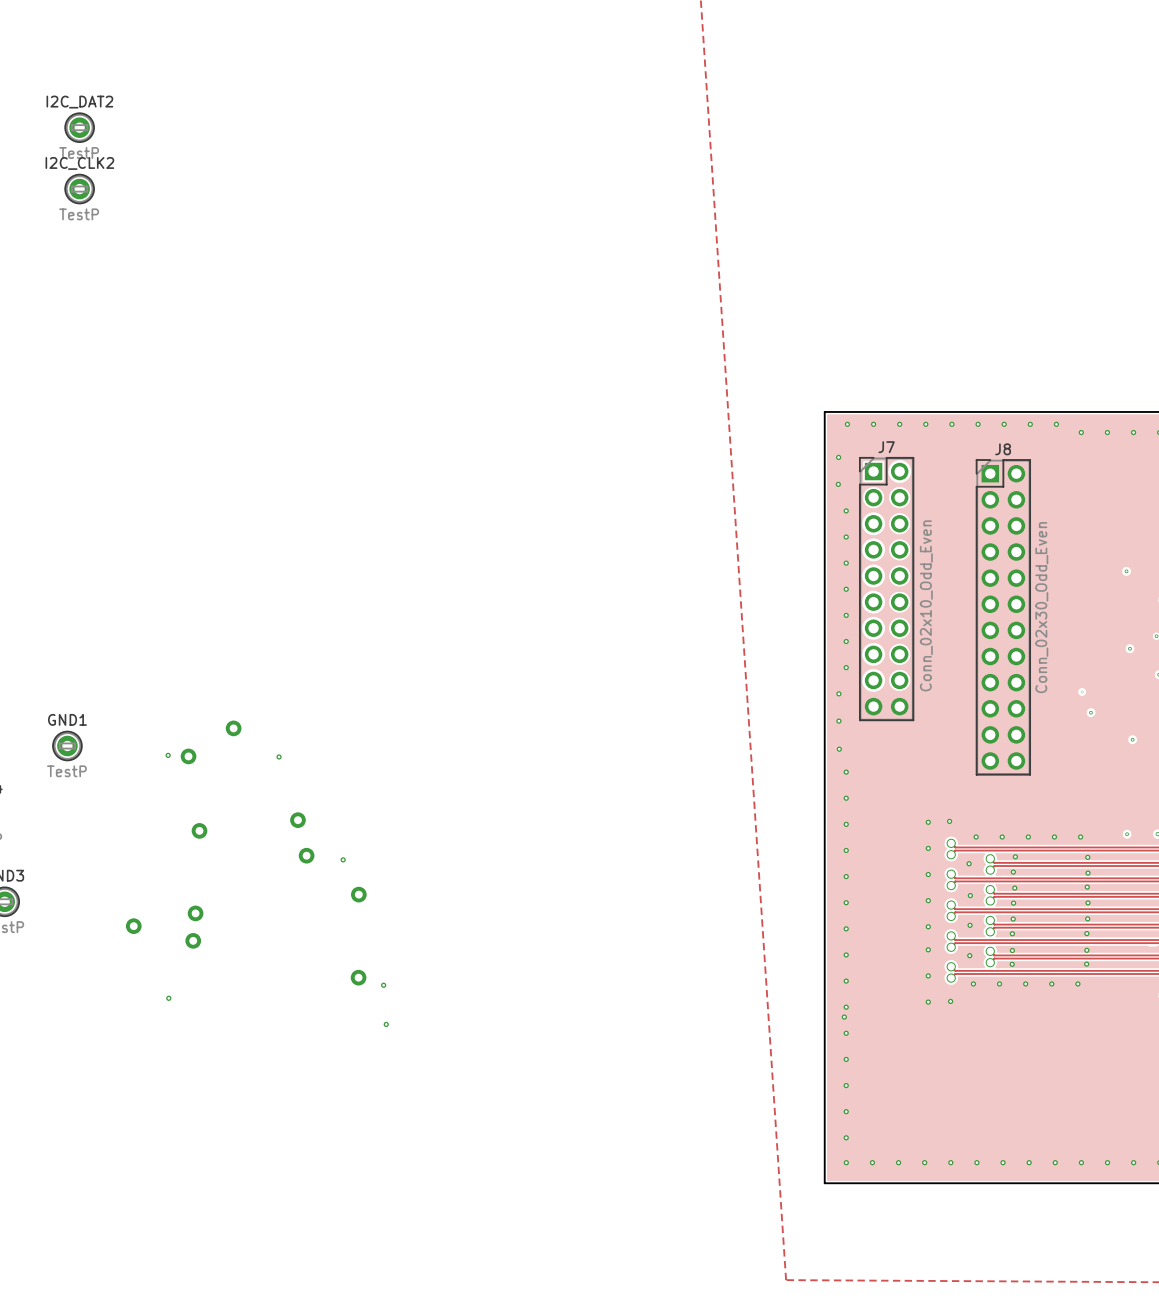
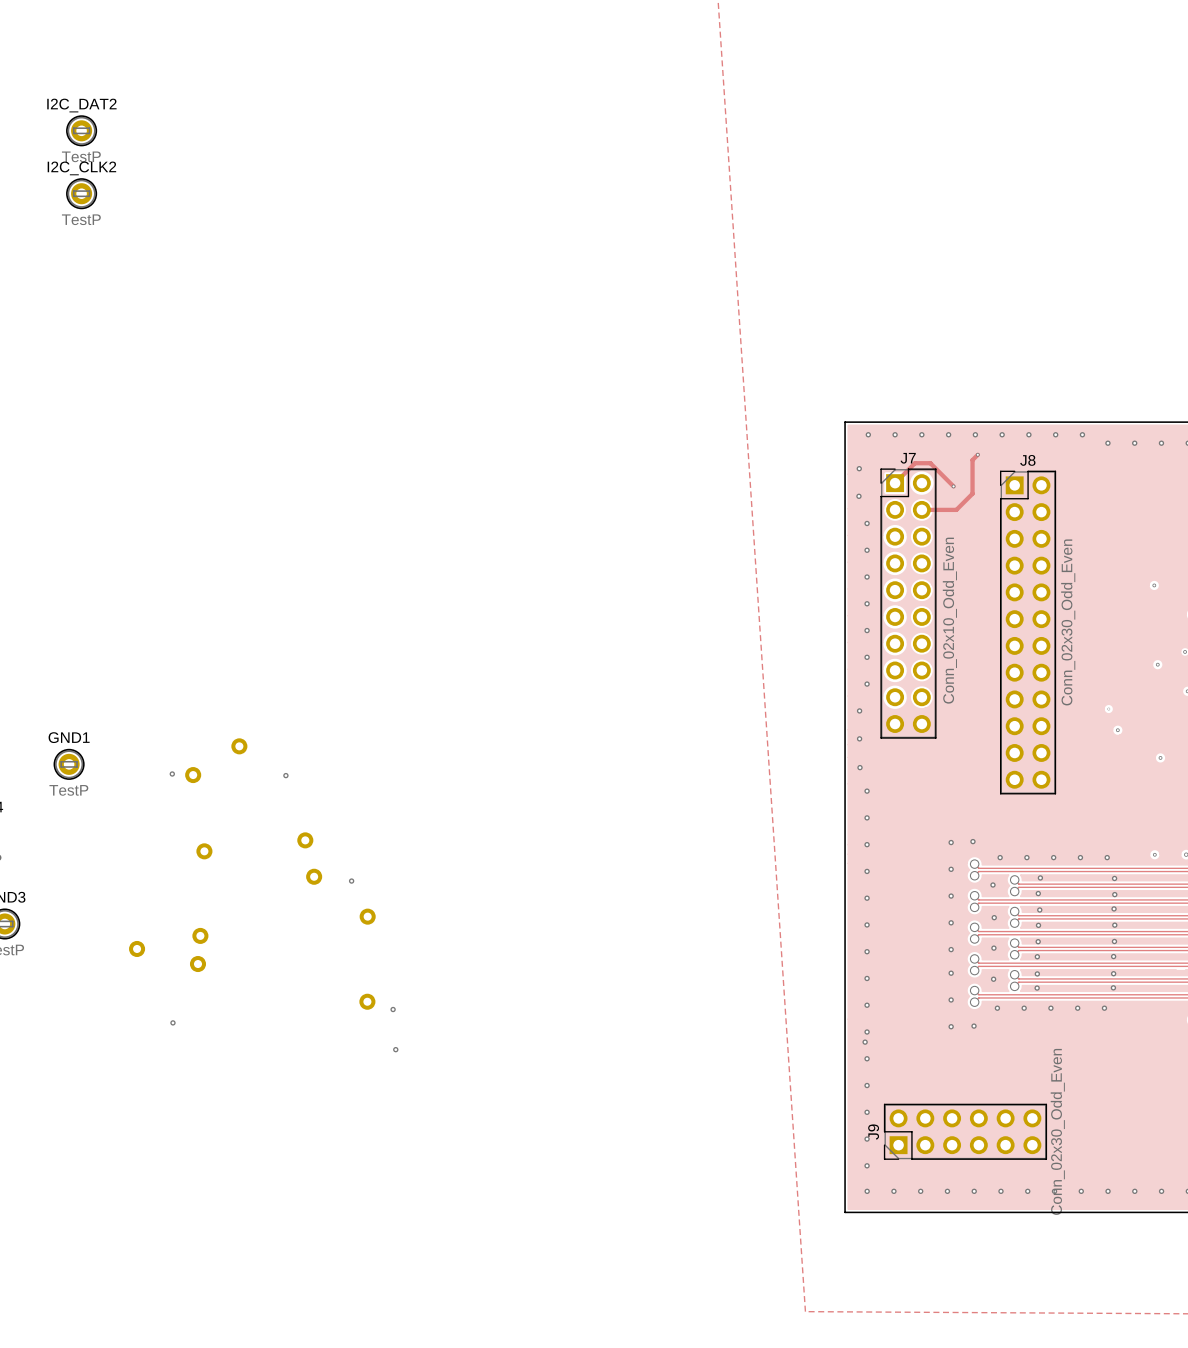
track: none -> (977, 454) (972, 460) (972, 493) (956, 509) (921, 509)
via: none -> (977, 454)
track: none -> (895, 483) (915, 463) (930, 463) (953, 486)
via: none -> (953, 486)
J9: none -> Conn_02x30_Odd_Even (965, 1131)

